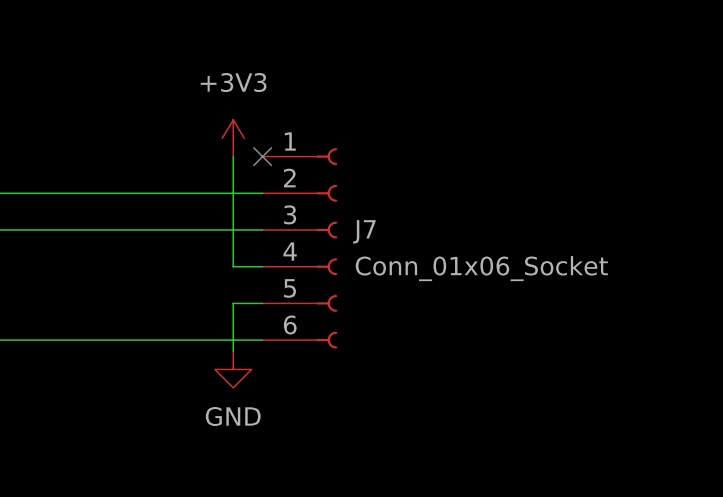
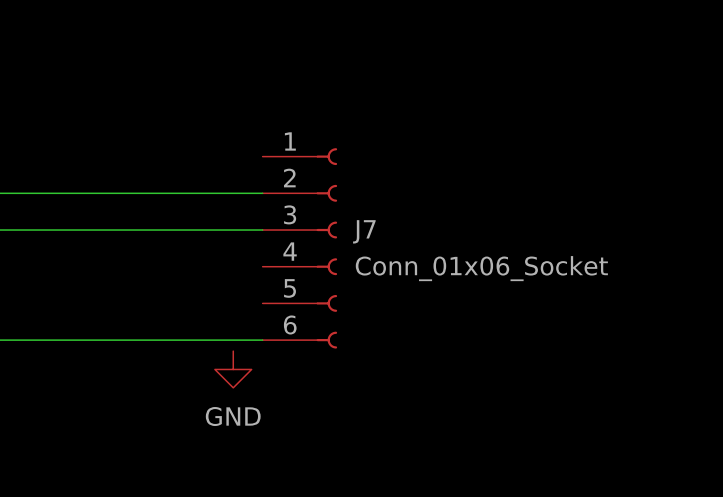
power symbol: +3V3 (233, 138) -> none
wire: (233, 156) (233, 266) (262, 266) -> none
no-connect mark: (262, 156) -> none
wire: (262, 303) (233, 303) (233, 351) -> none

